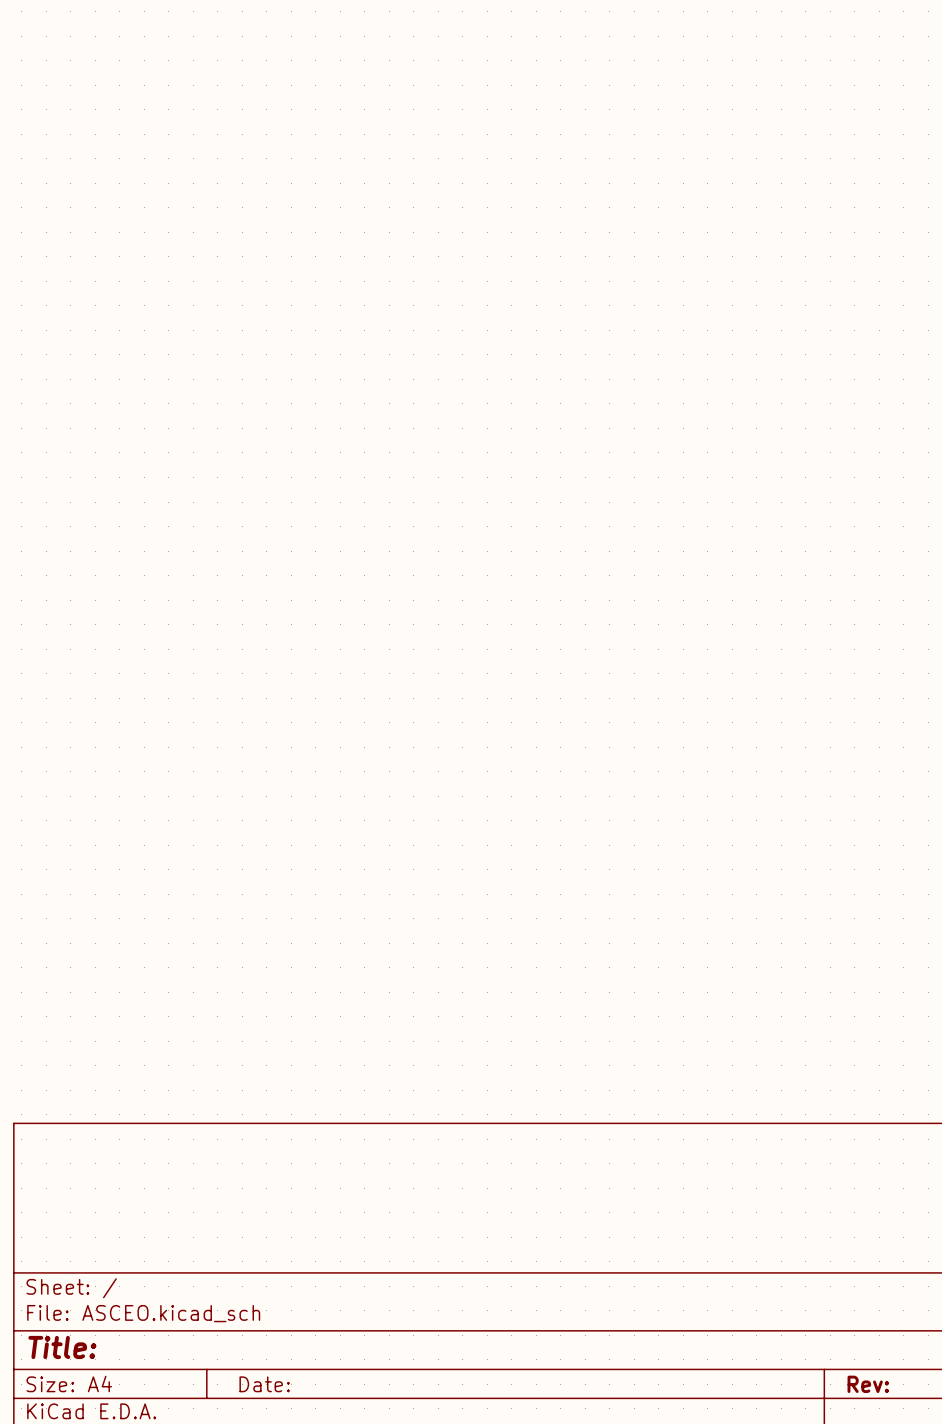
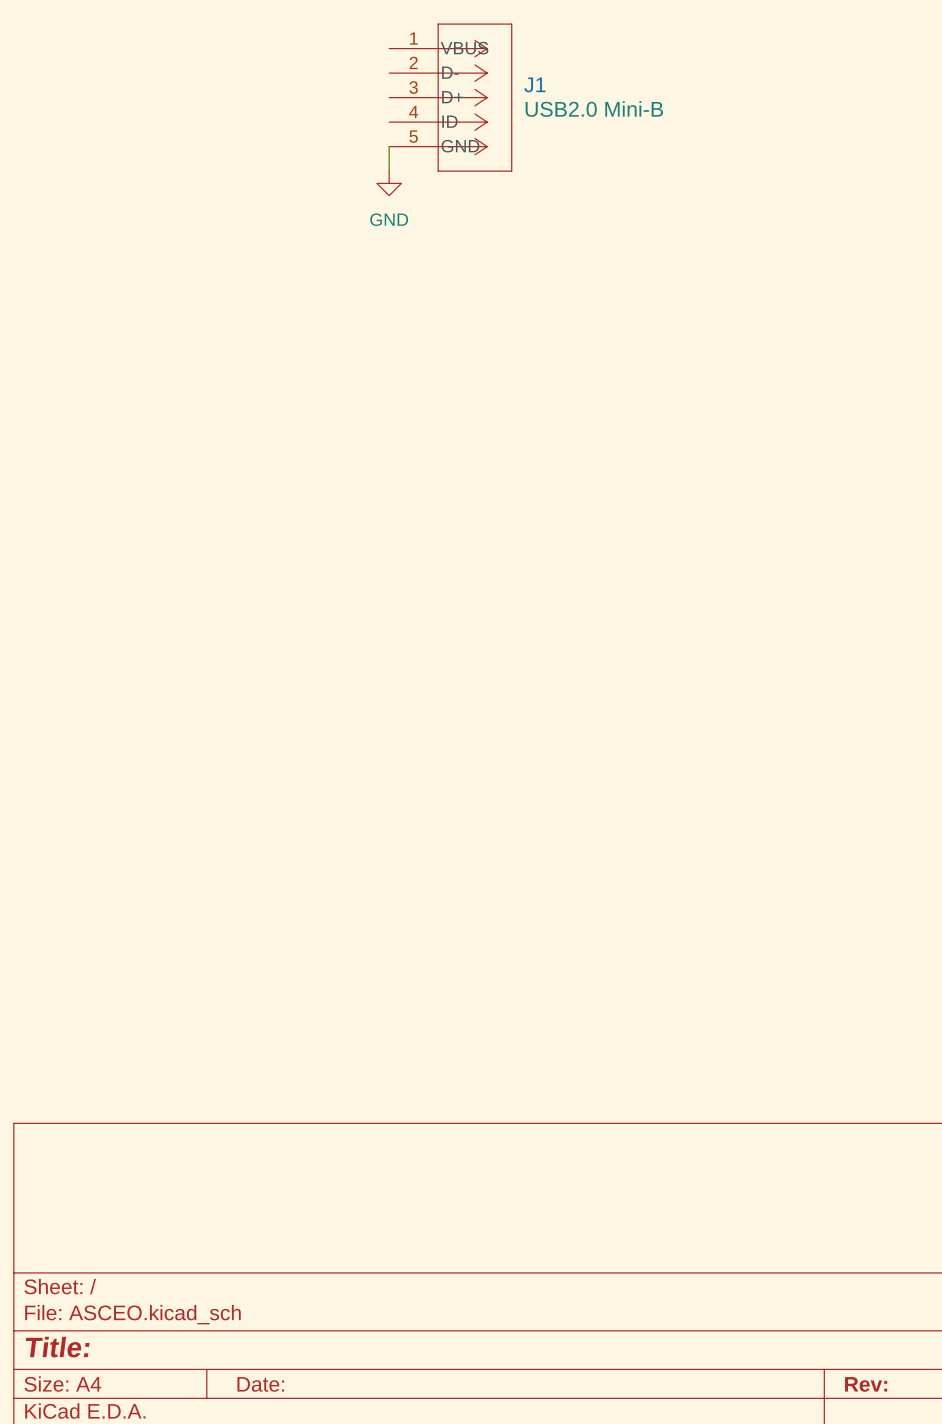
J1: none -> USB2.0 Mini-B (450, 97)
wire: none -> (389, 146) (389, 171)
power symbol: none -> GND (389, 183)

